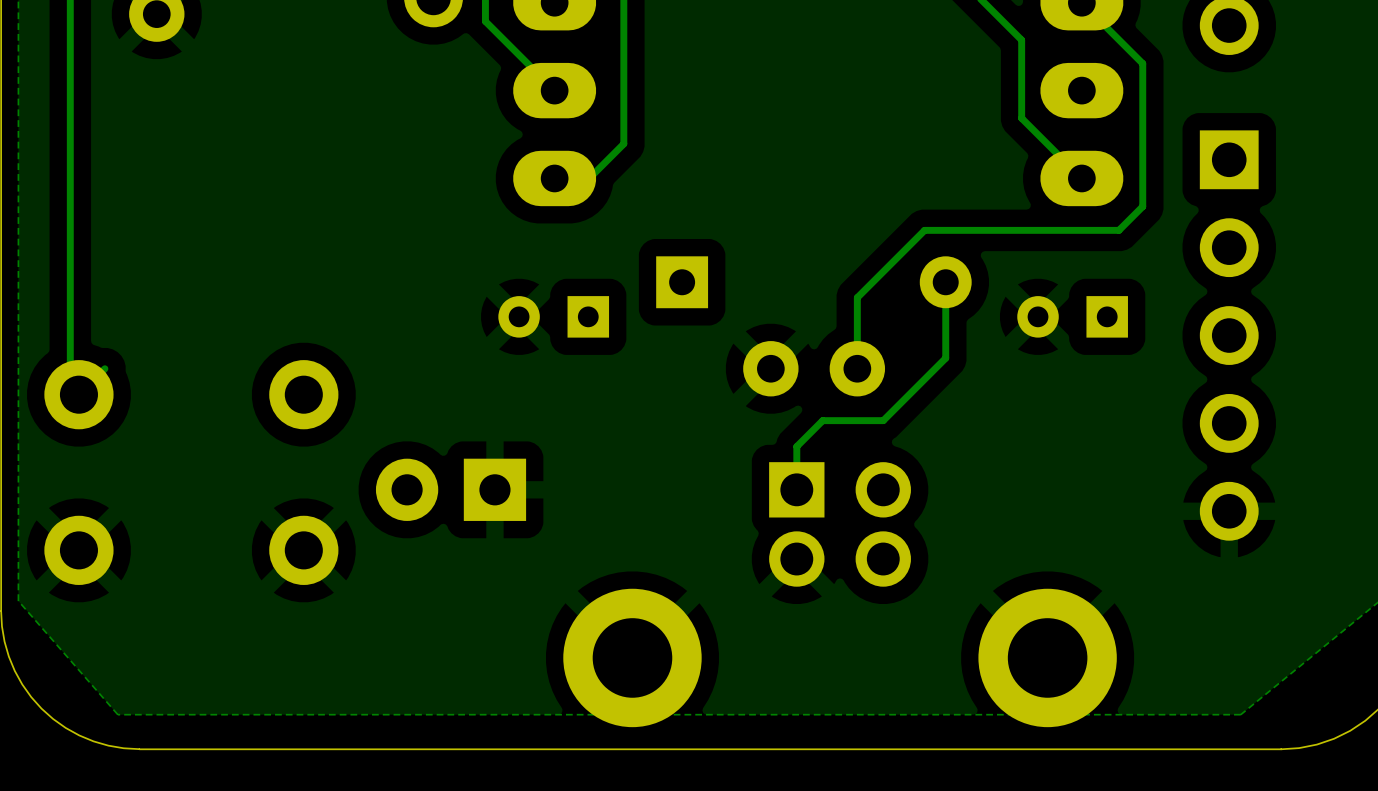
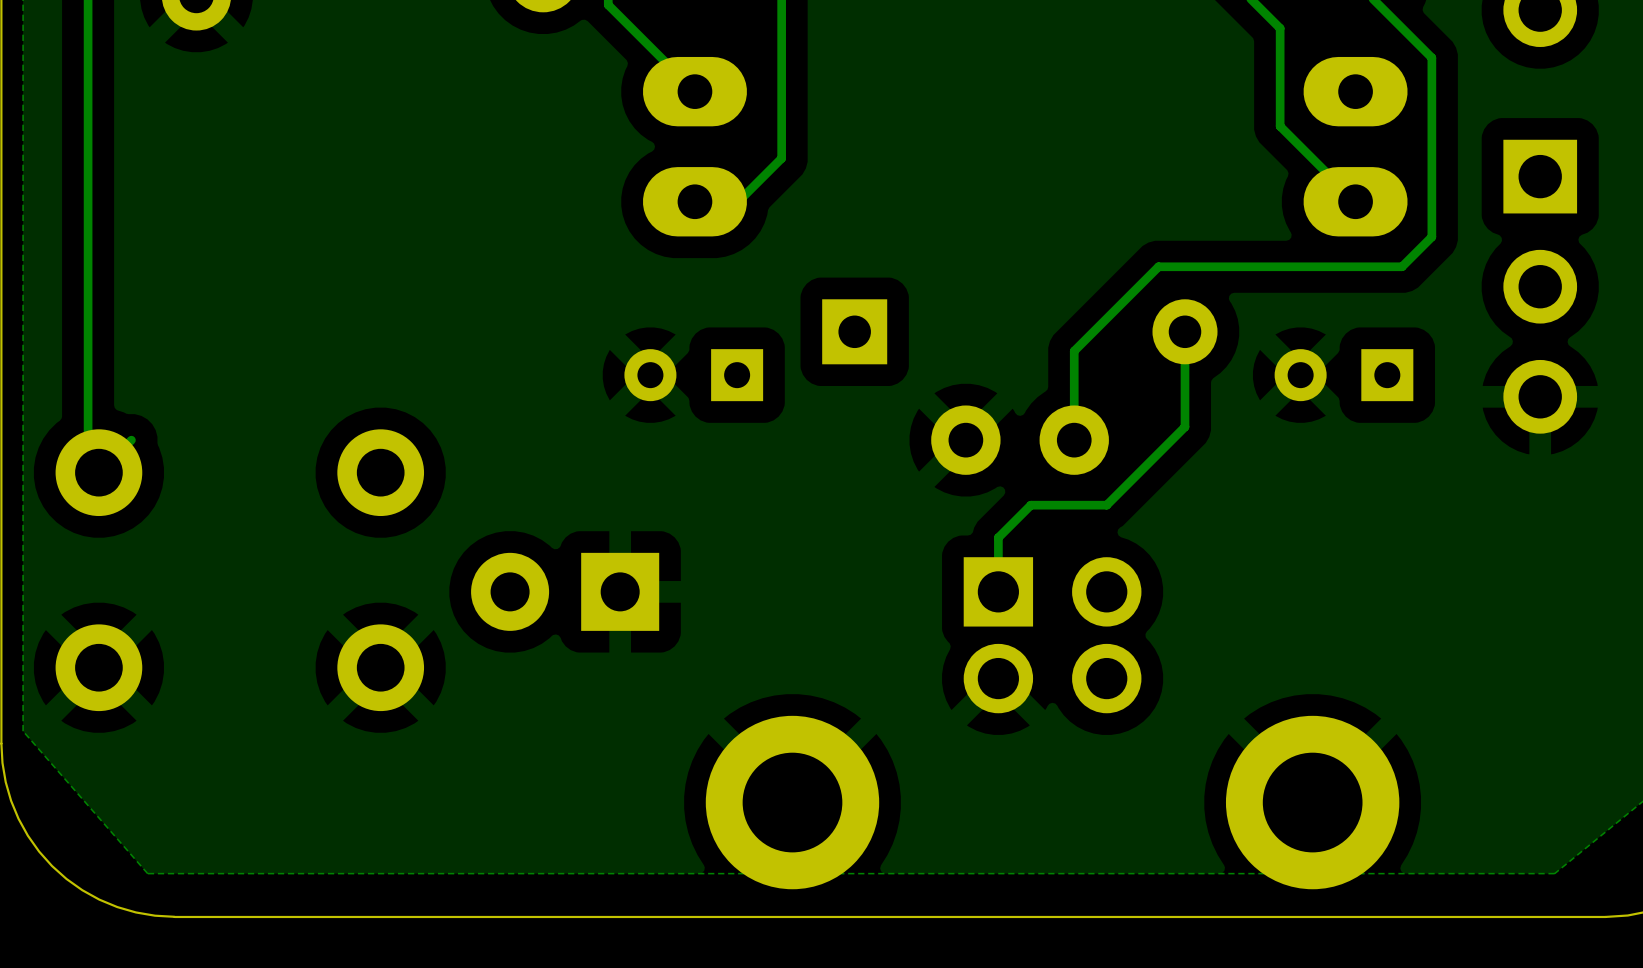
part: none -> (1540, 286)
part: (1229, 335) -> none

